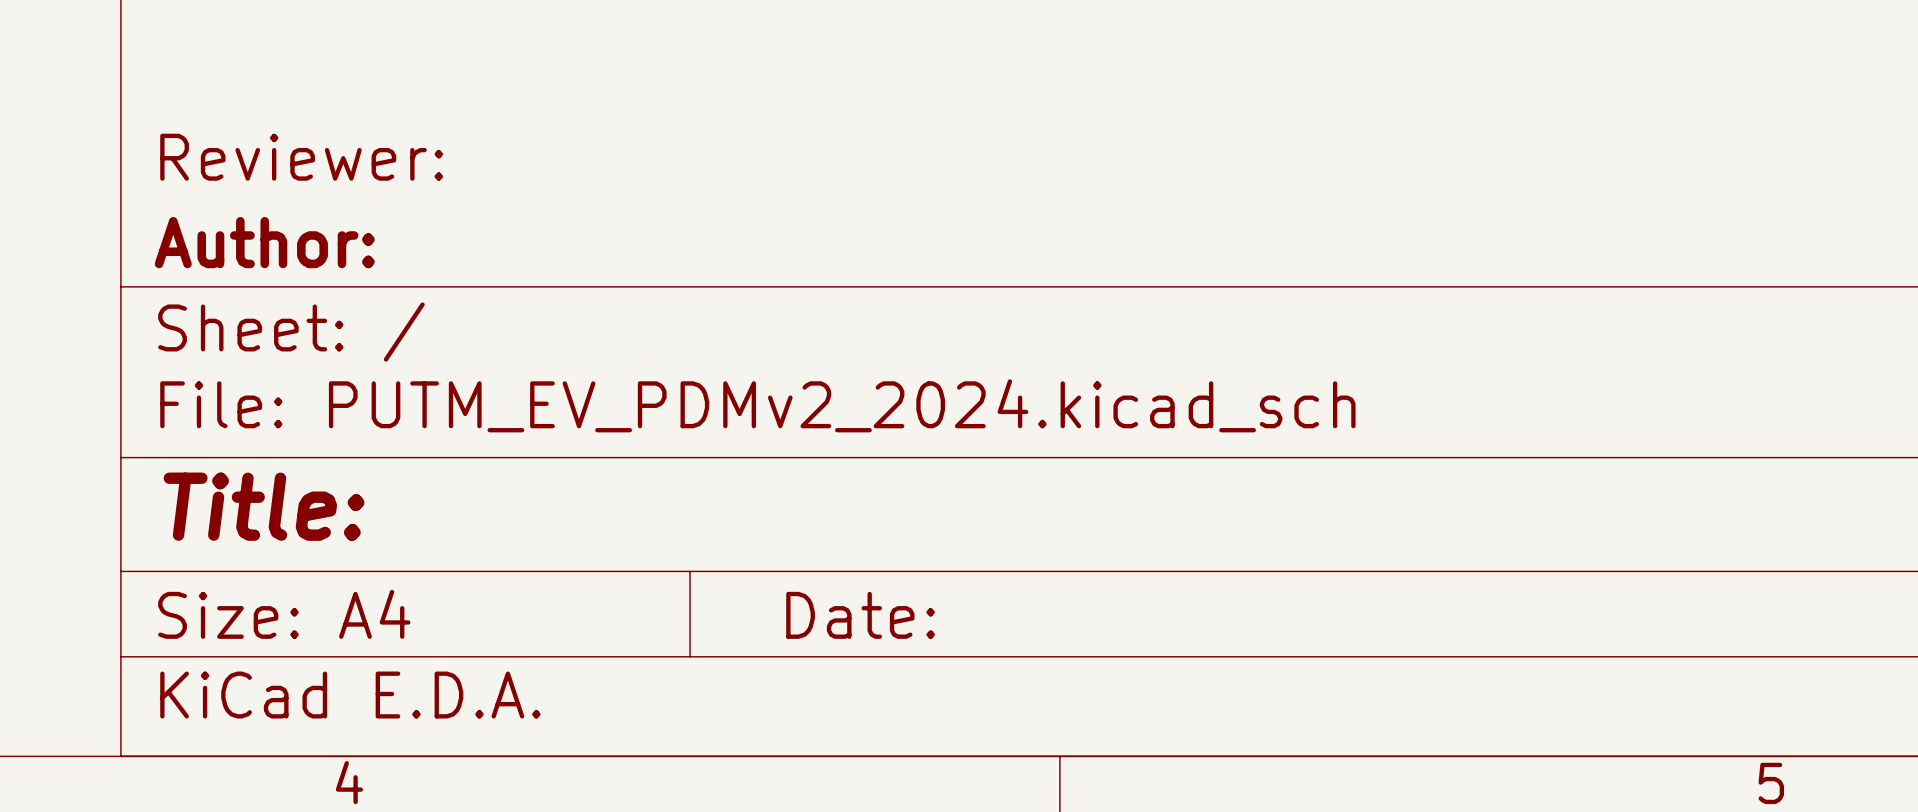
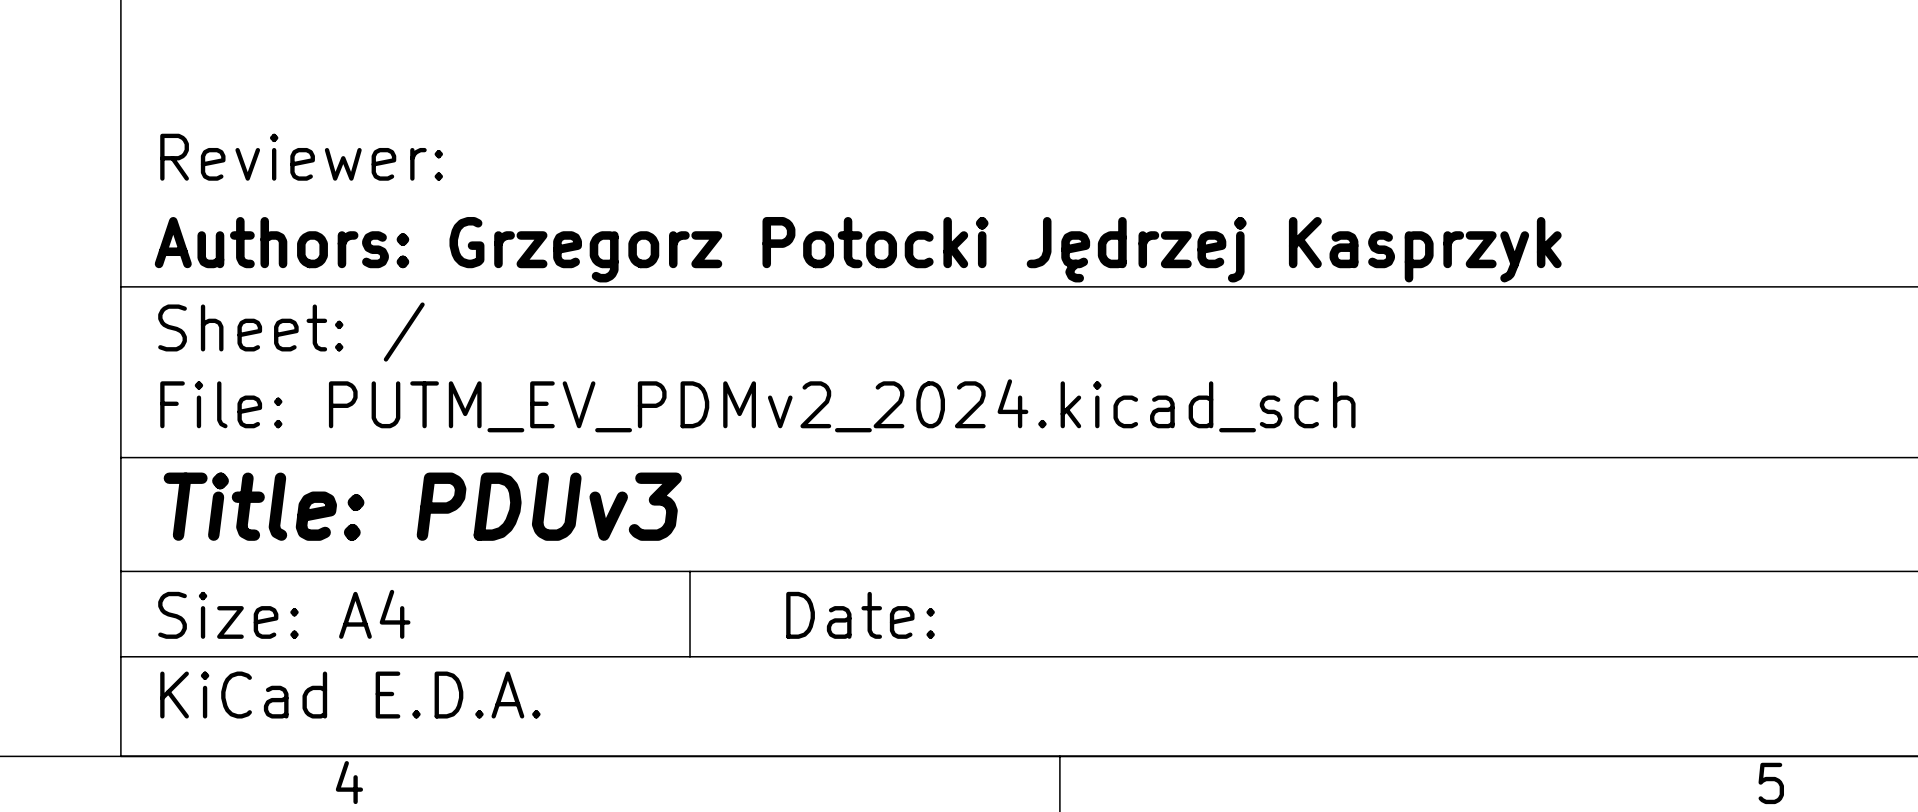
title block: Author: (264, 242) -> Authors: Grzegorz Potocki Jędrzej Kasprzyk (858, 249)
title block: Title: (264, 506) -> Title: PDUv3 (422, 506)

